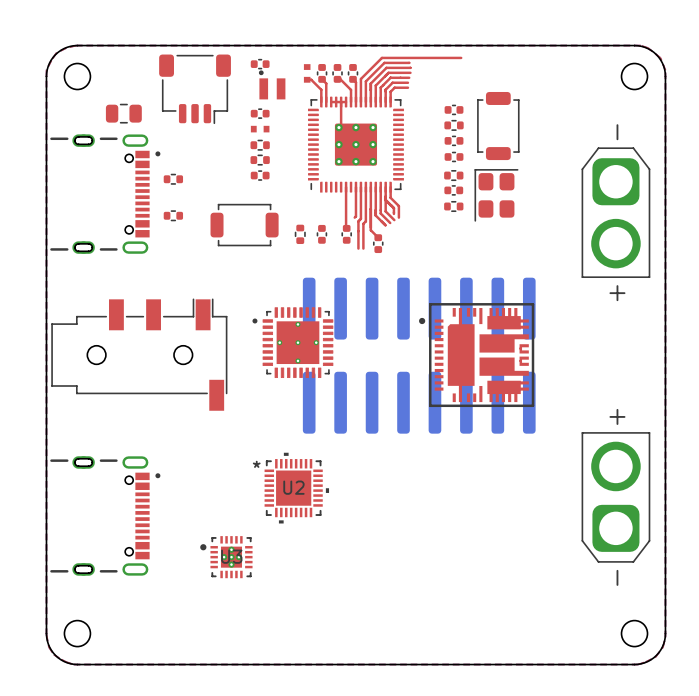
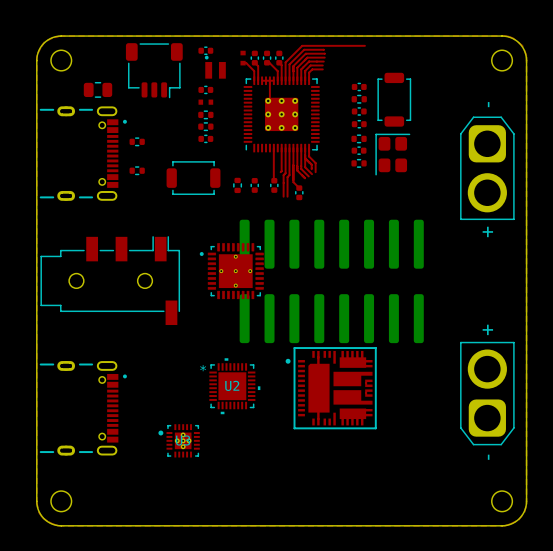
part position: (476, 355) -> (331, 388)

